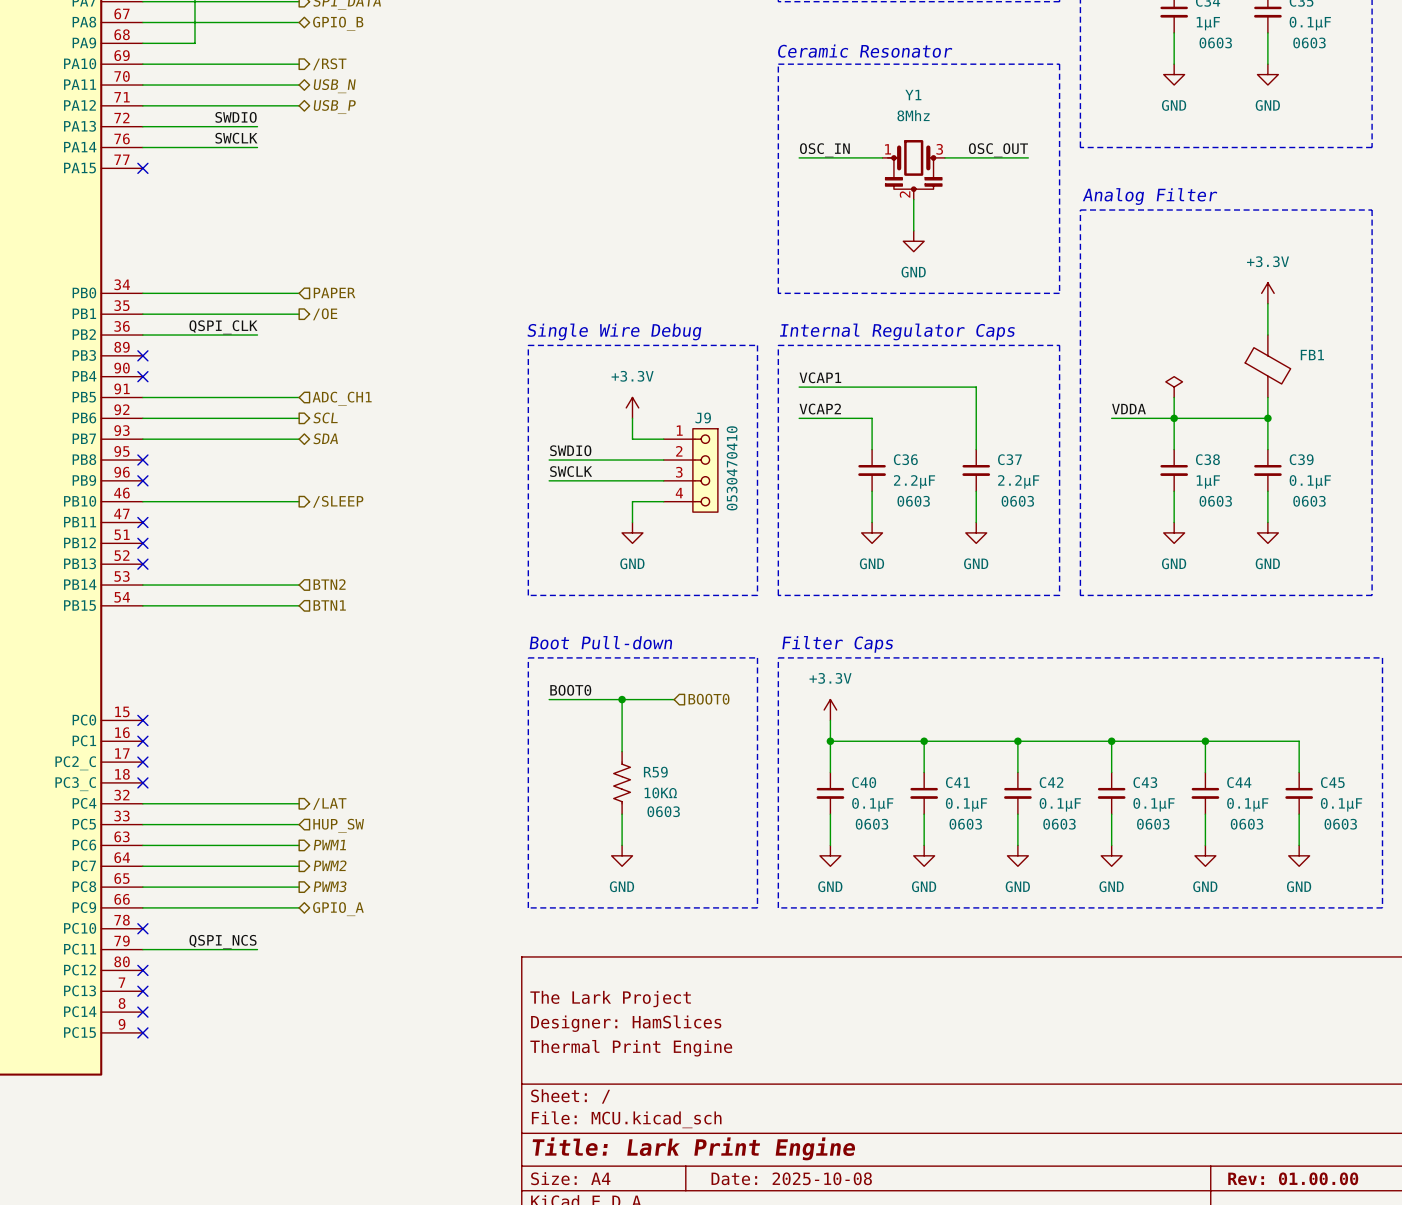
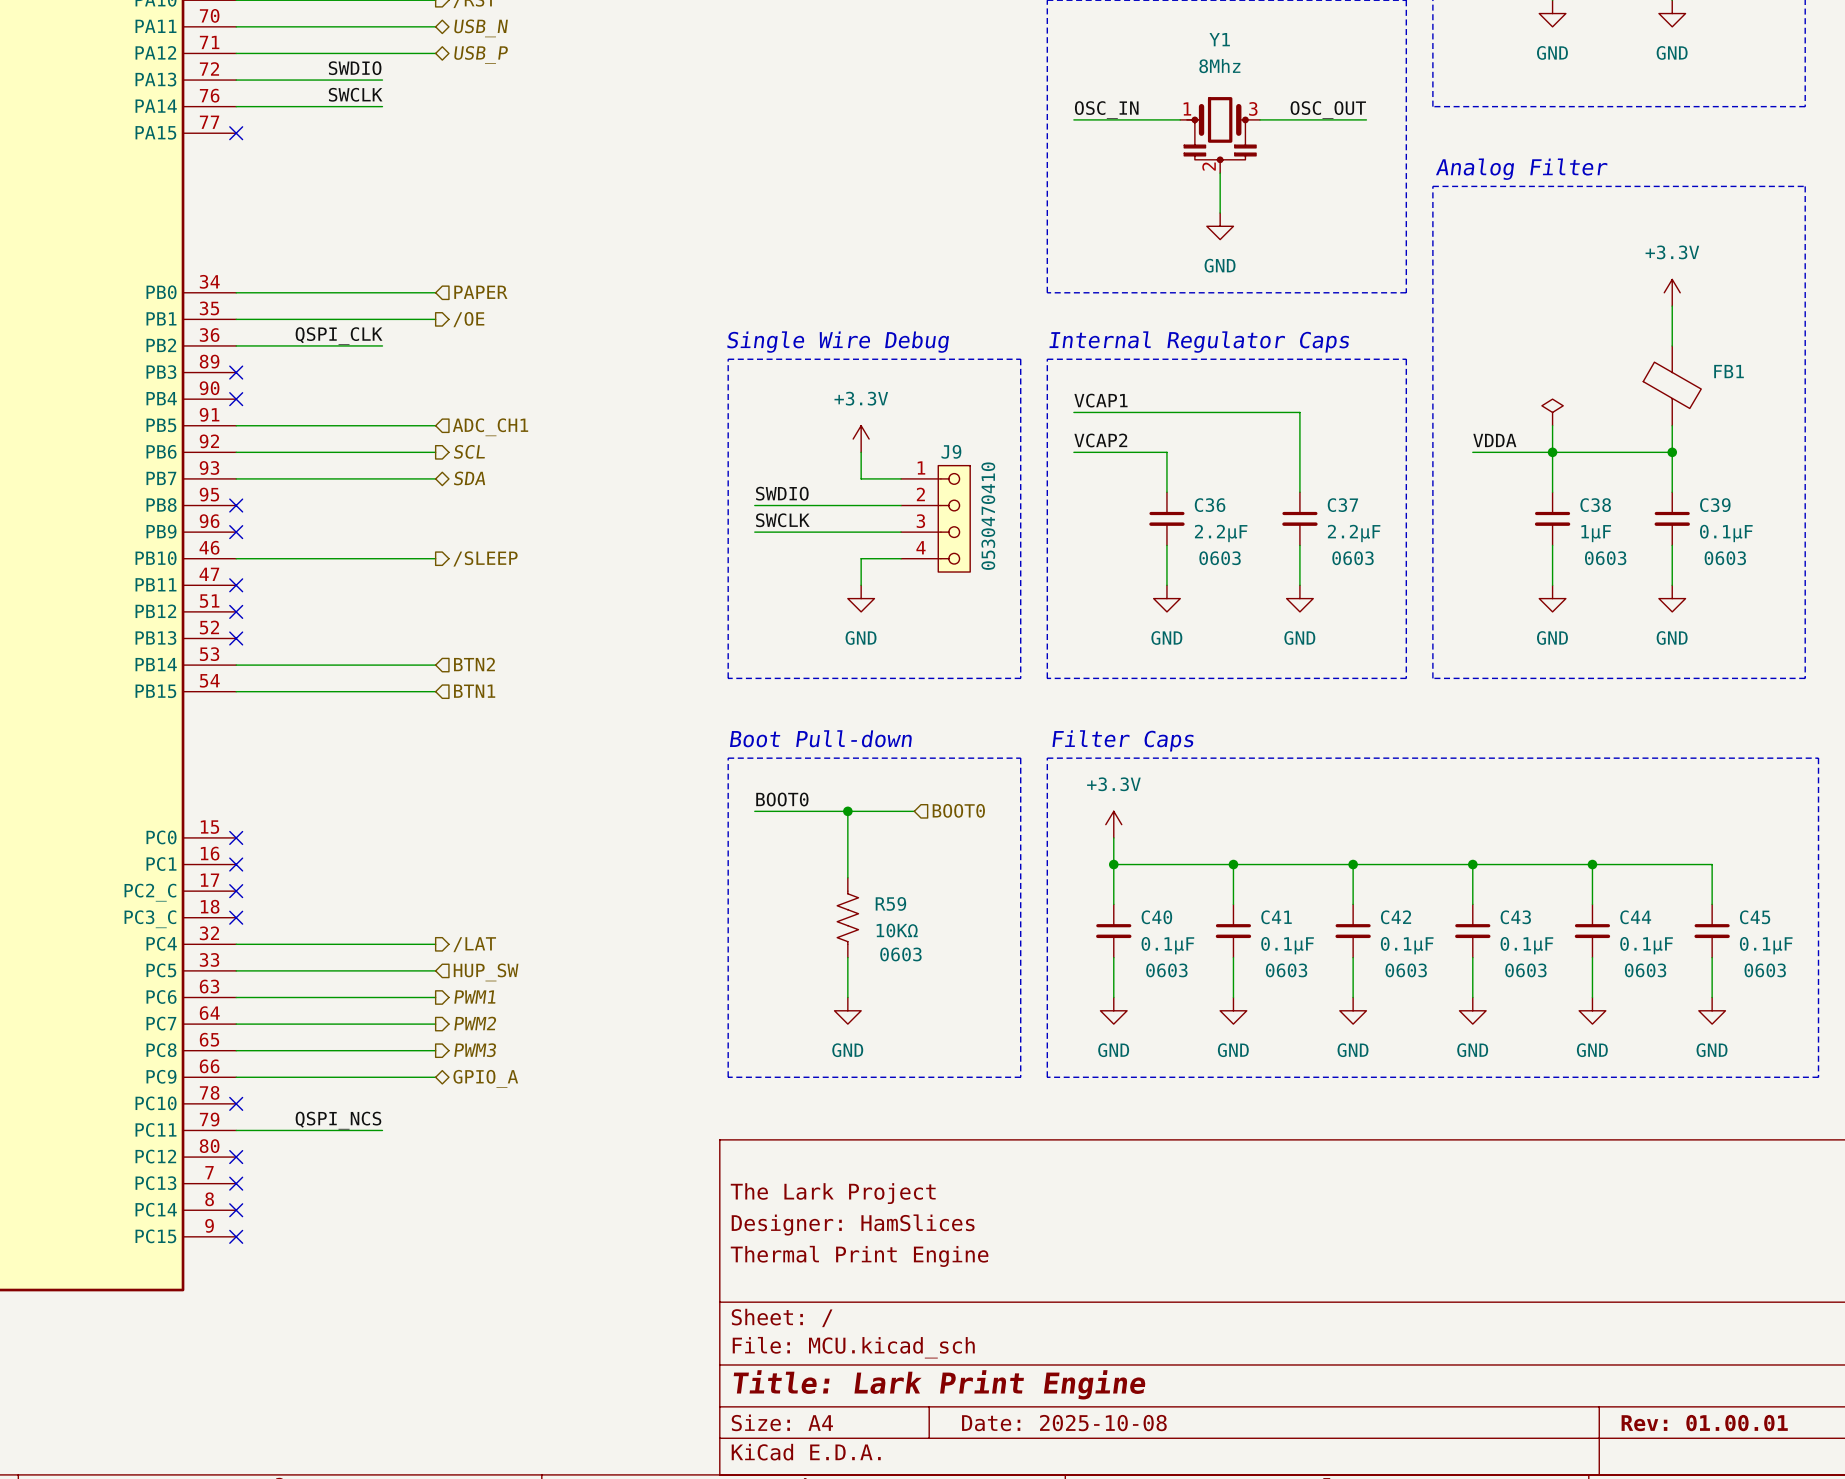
title block: Rev: 01.00.00 (1293, 1178) -> Rev: 01.00.01 (1704, 1423)

